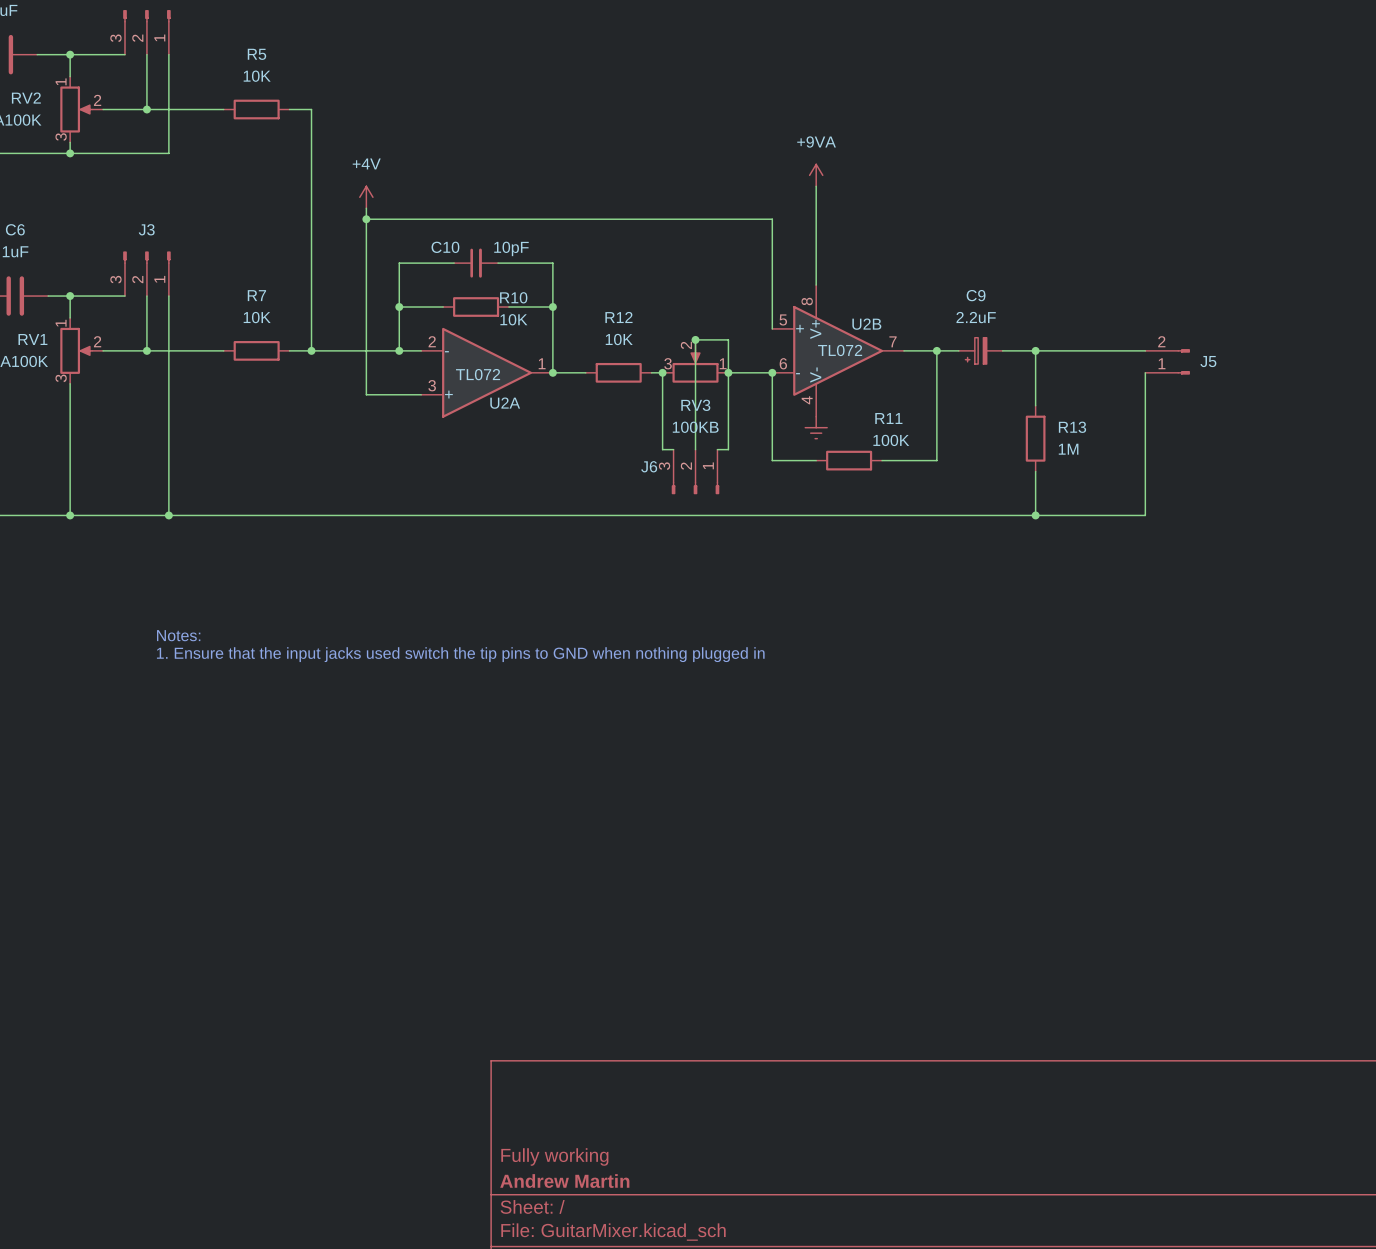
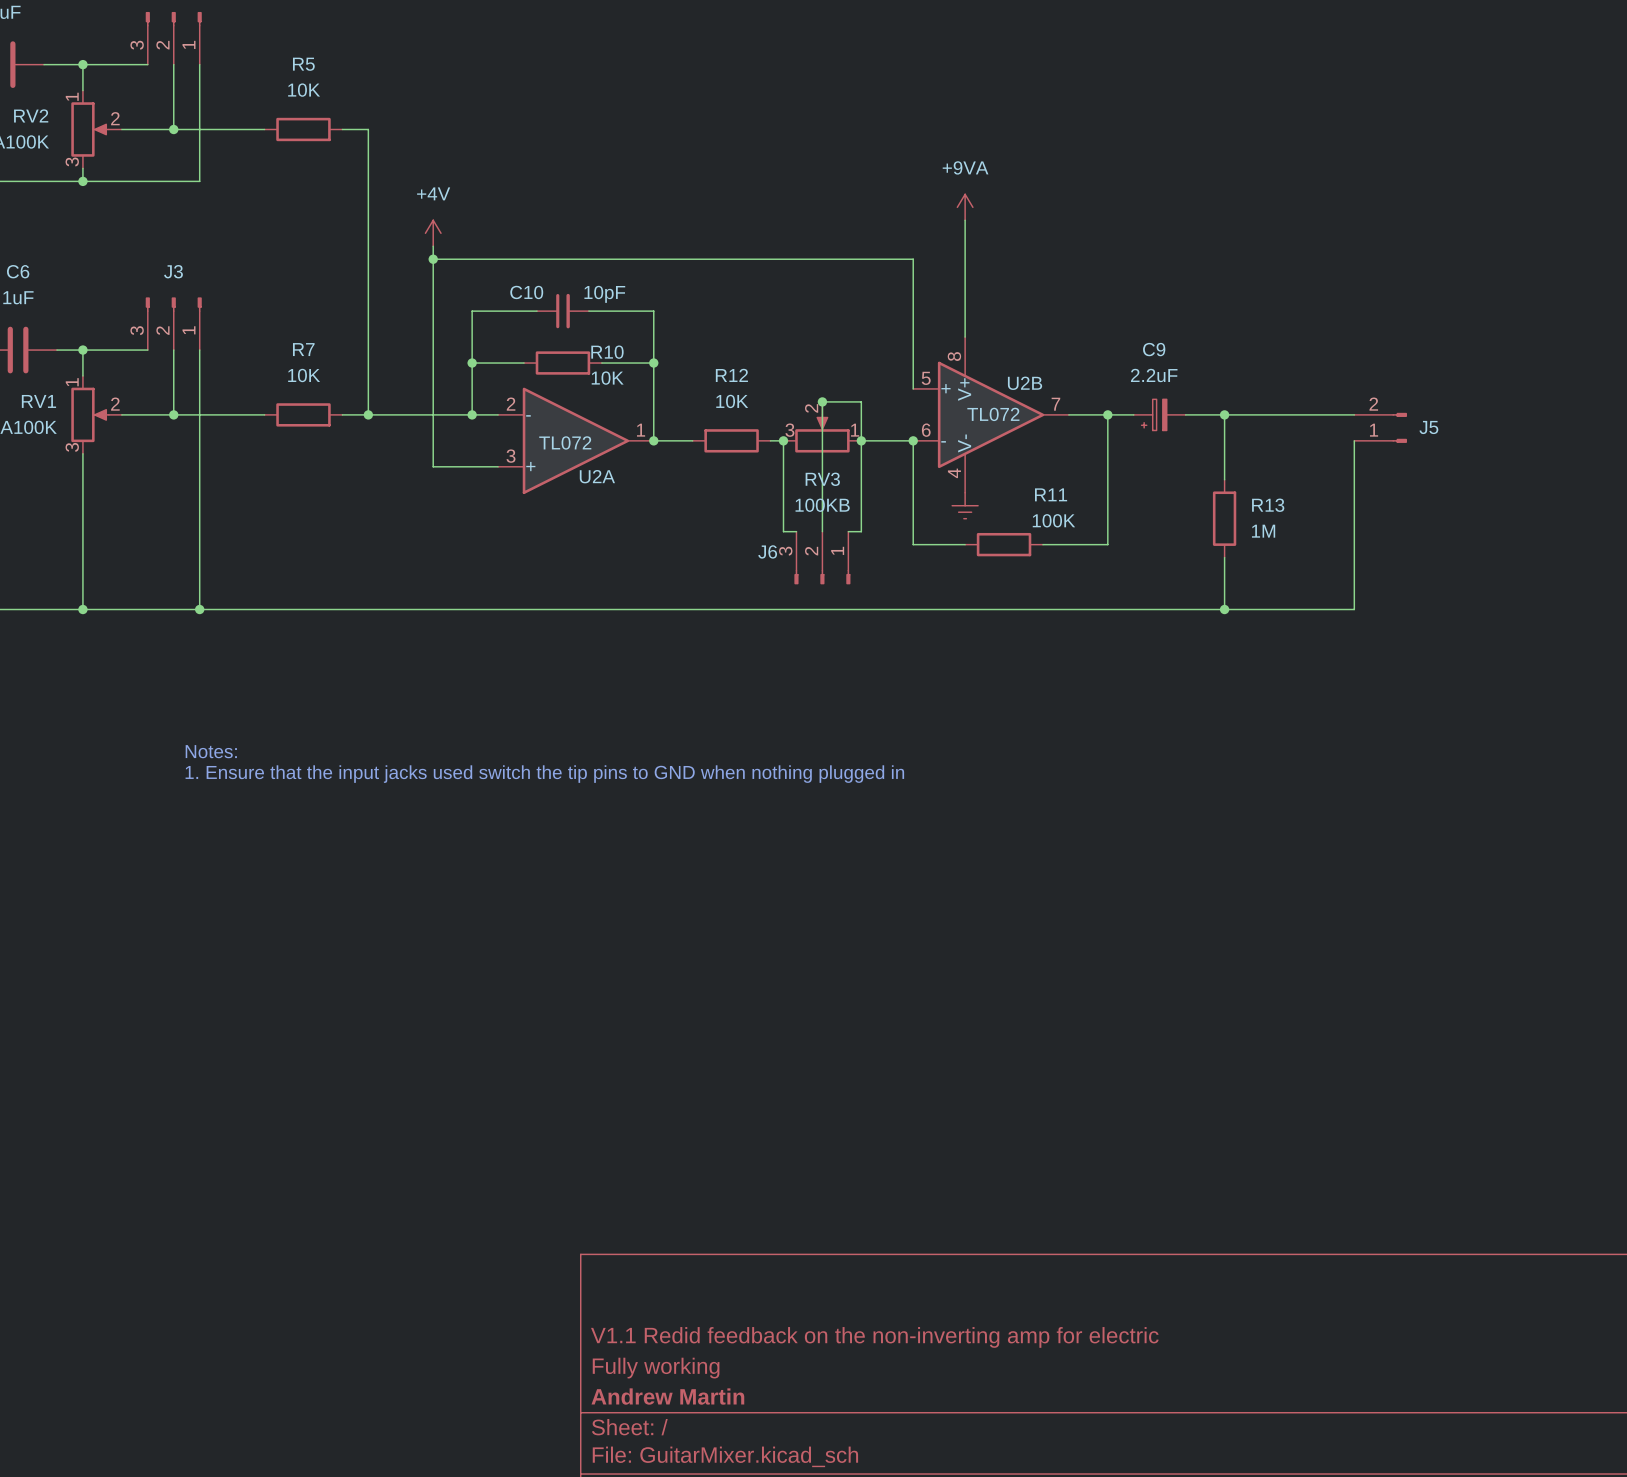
title block: none -> V1.1 Redid feedback on the non-inverting amp for electric (874, 1337)

